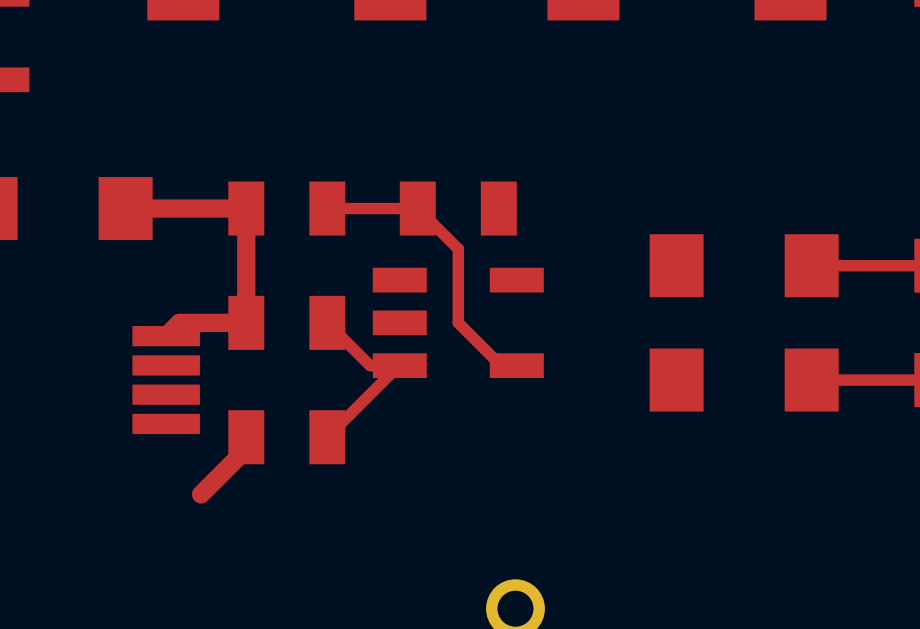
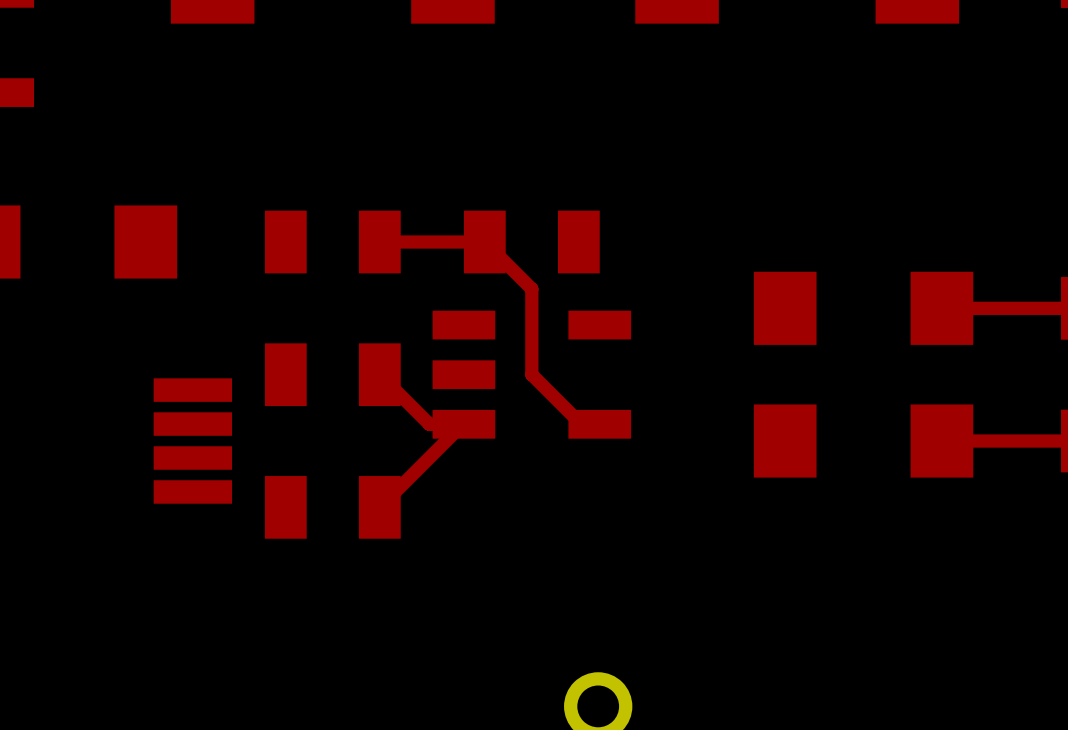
top track: (125, 208) (246, 208) (246, 322) (179, 322) (166, 336) -> none
top track: (246, 437) (246, 449) (201, 494) -> none

